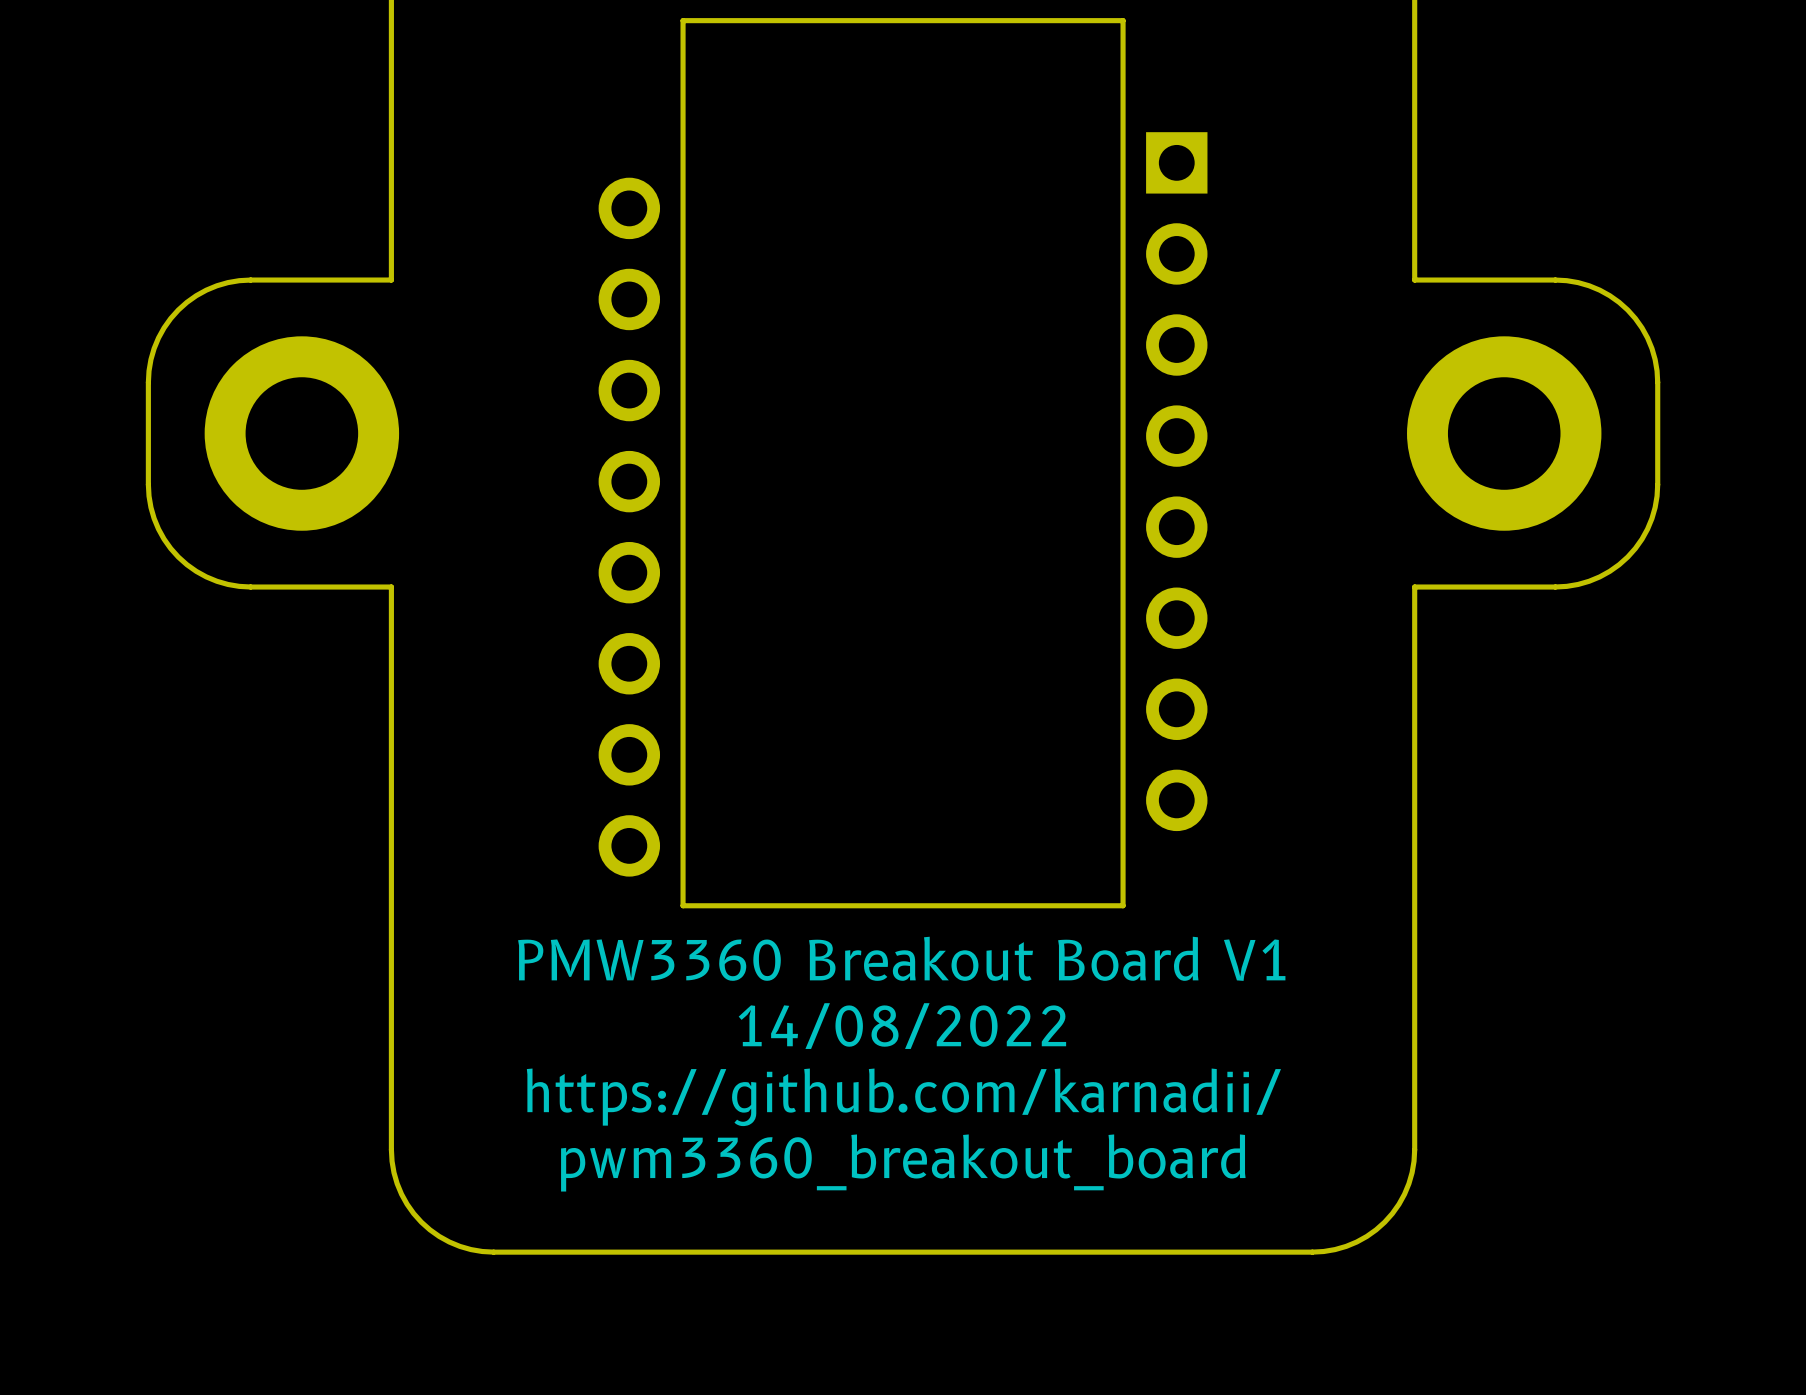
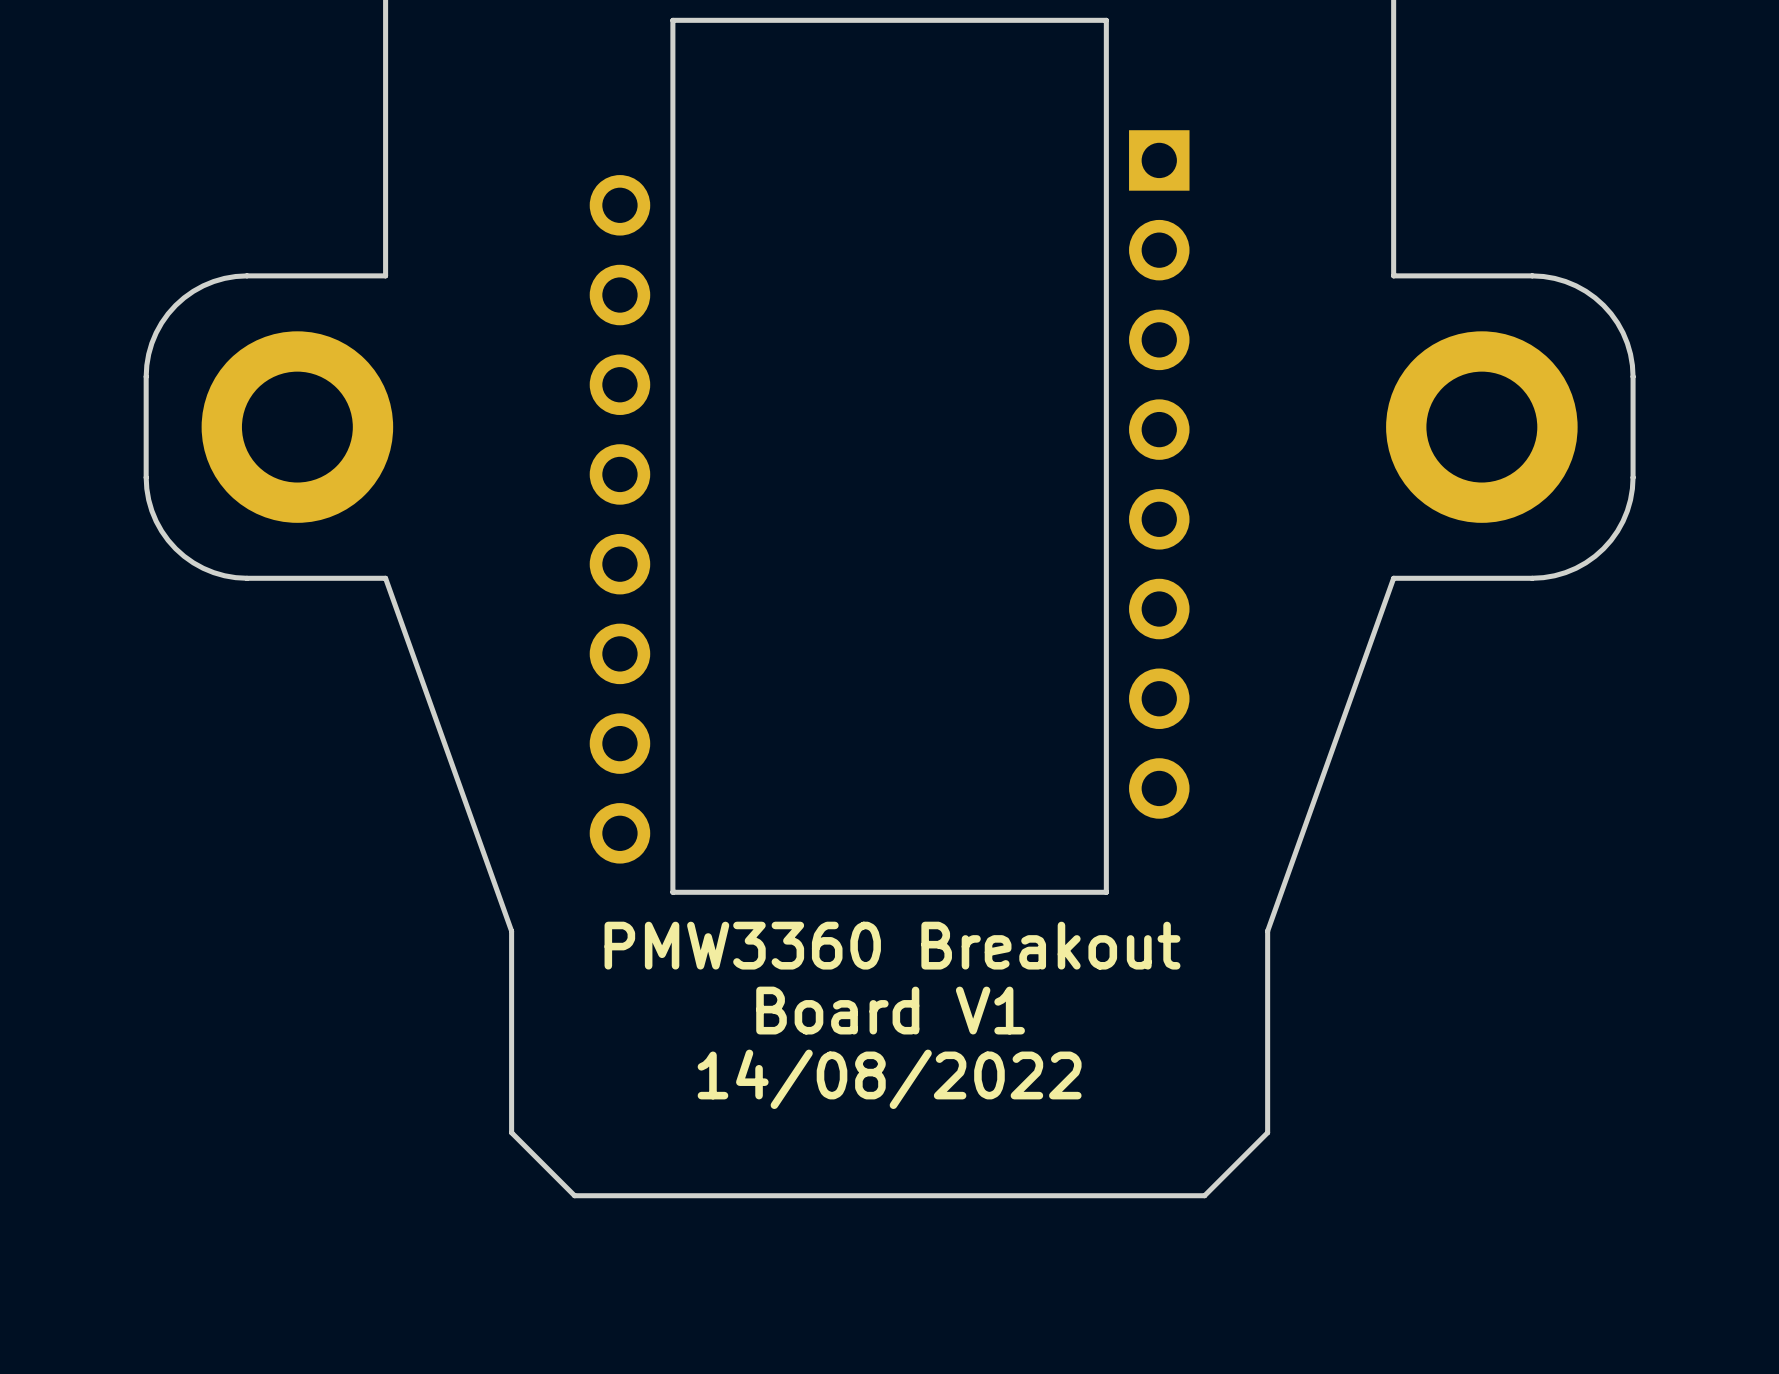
board edge: (1414, 587) (1414, 1161) (1404, 1194) (1384, 1222) (1356, 1242) (1335, 1249) (1312, 1252) (493, 1252) (459, 1246) (429, 1229) (413, 1213) (401, 1194) (392, 1161) (391, 587) -> (1393, 578) (1267, 931) (1267, 1132) (1204, 1195) (574, 1195) (511, 1132) (511, 931) (385, 578)
text: PMW3360 Breakout Board V1 (901, 958) -> PMW3360 Breakout (892, 945)
text: 14/08/2022 (902, 1026) -> Board V1 (890, 1010)
text: https://github.com/karnadii/ (903, 1097) -> 14/08/2022 (889, 1079)
text: pwm3360_breakout_board (903, 1162) -> none

